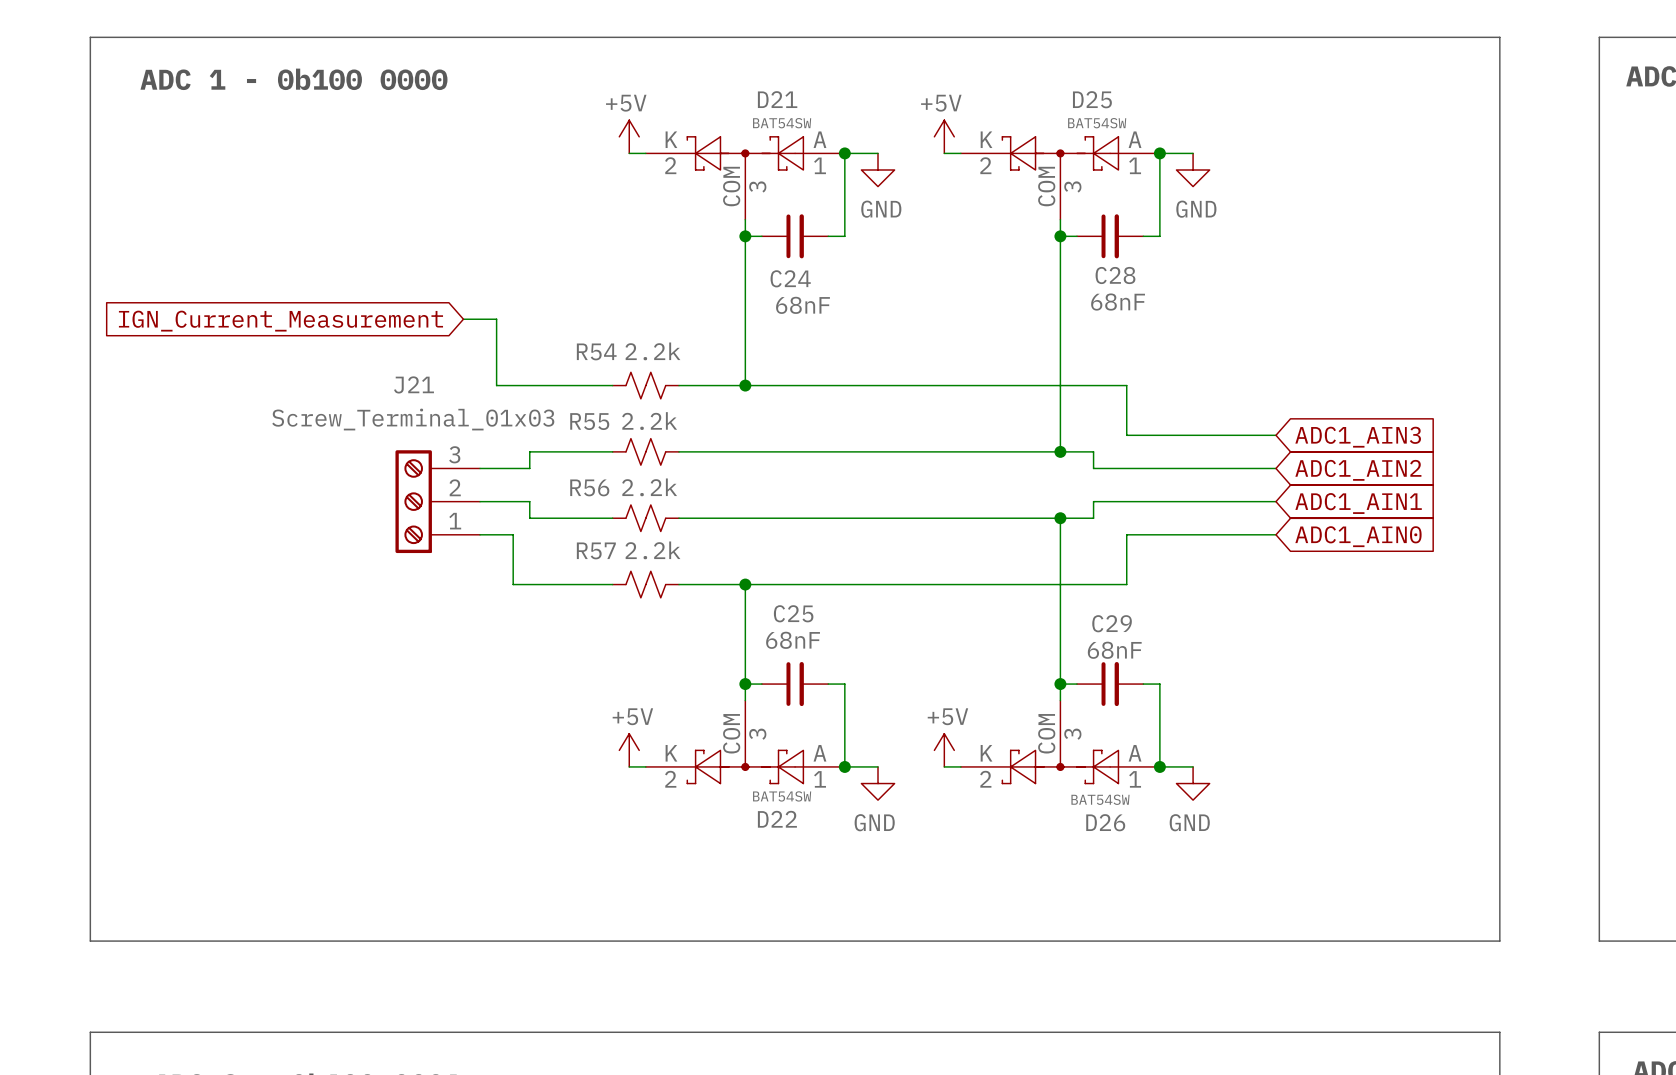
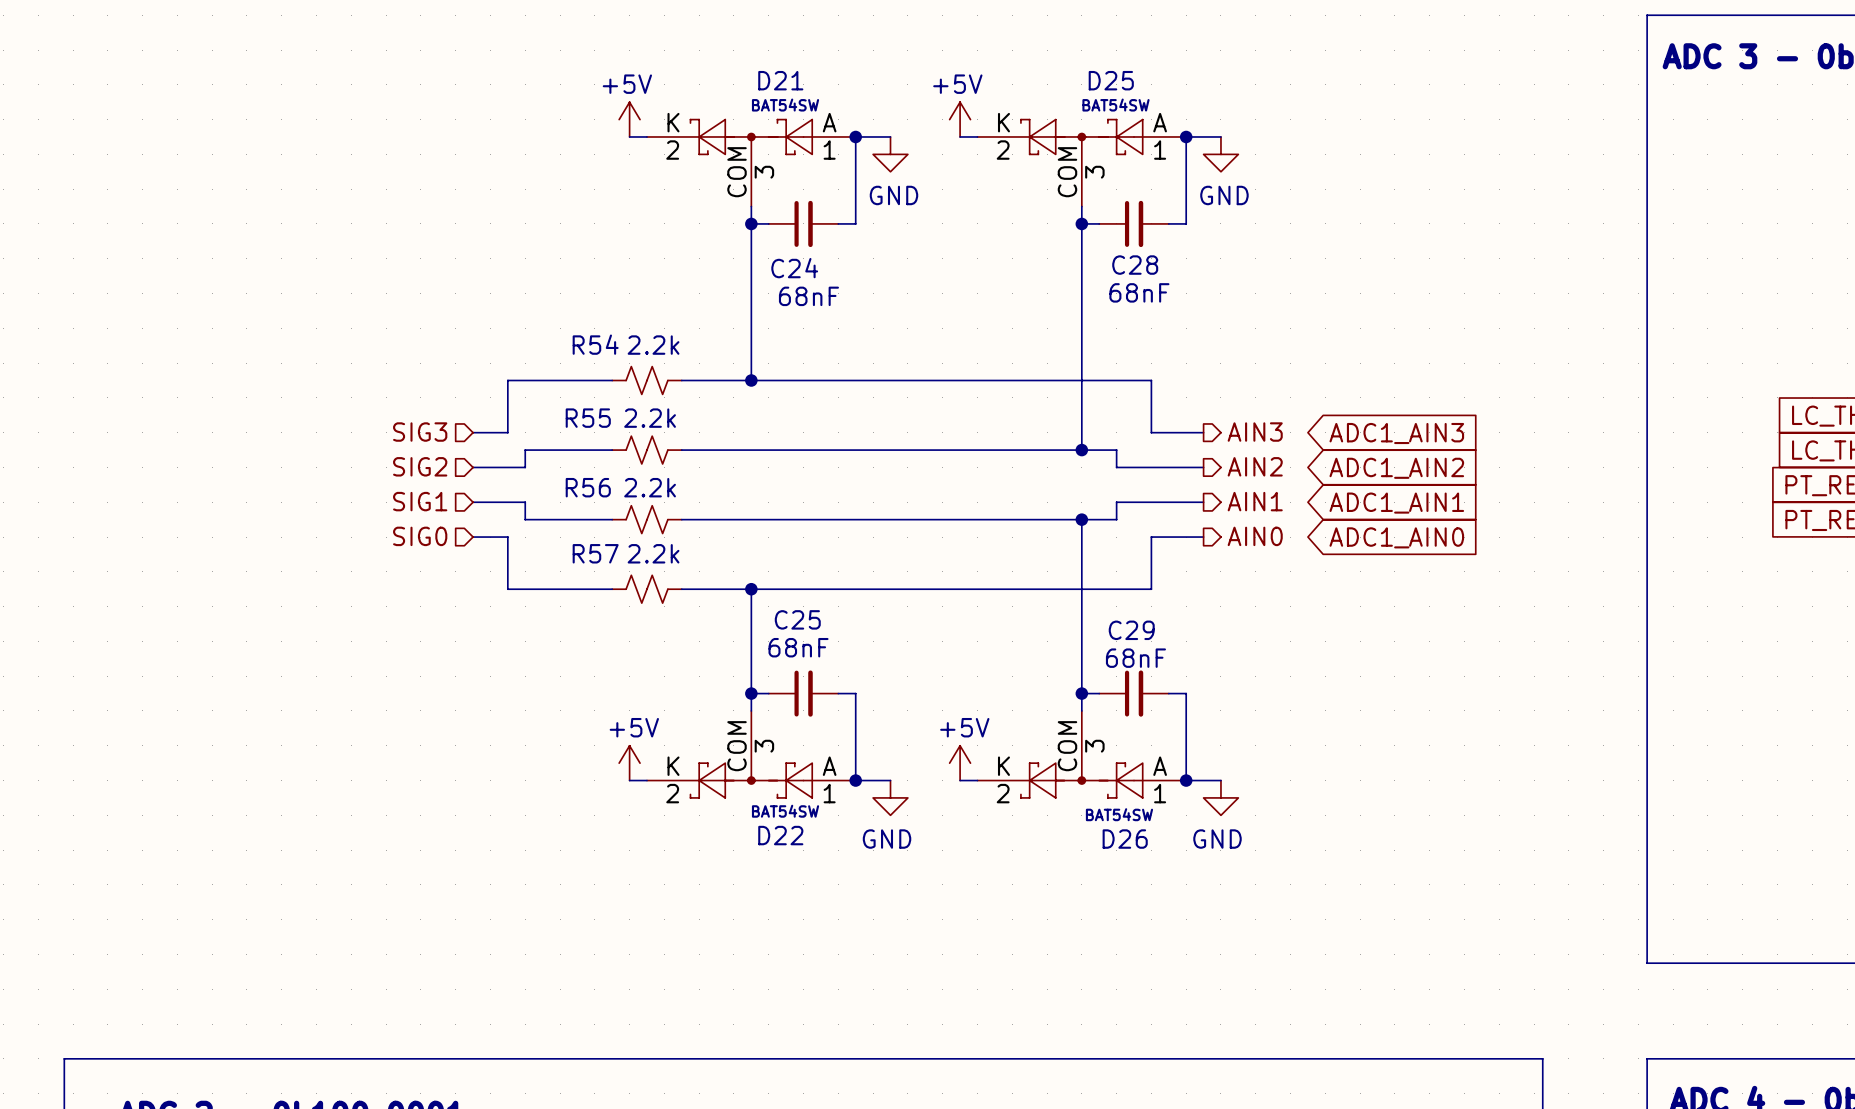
line: (90, 37) (90, 941) (1499, 941) (1499, 37) (90, 37) -> none
text: ADC 1 - 0b100 0000 (293, 79) -> none
wire: (463, 319) (496, 319) (496, 385) (513, 385) -> (473, 432) (507, 432) (507, 380)
global label: IGN_Current_Measurement (280, 321) -> none
hierarchical label: none -> SIG3 (420, 432)
hierarchical label: none -> AIN3 (1255, 432)
wire: (1176, 435) (1275, 435) -> none
hierarchical label: none -> SIG2 (420, 466)
hierarchical label: none -> AIN2 (1255, 466)
wire: (1176, 468) (1275, 468) -> none
hierarchical label: none -> SIG1 (420, 501)
J21: Screw_Terminal_01x03 (437, 501) -> none
wire: (1176, 501) (1275, 501) -> none
hierarchical label: none -> AIN1 (1255, 501)
hierarchical label: none -> SIG0 (420, 536)
wire: (1176, 534) (1275, 534) -> none
hierarchical label: none -> AIN0 (1255, 536)

